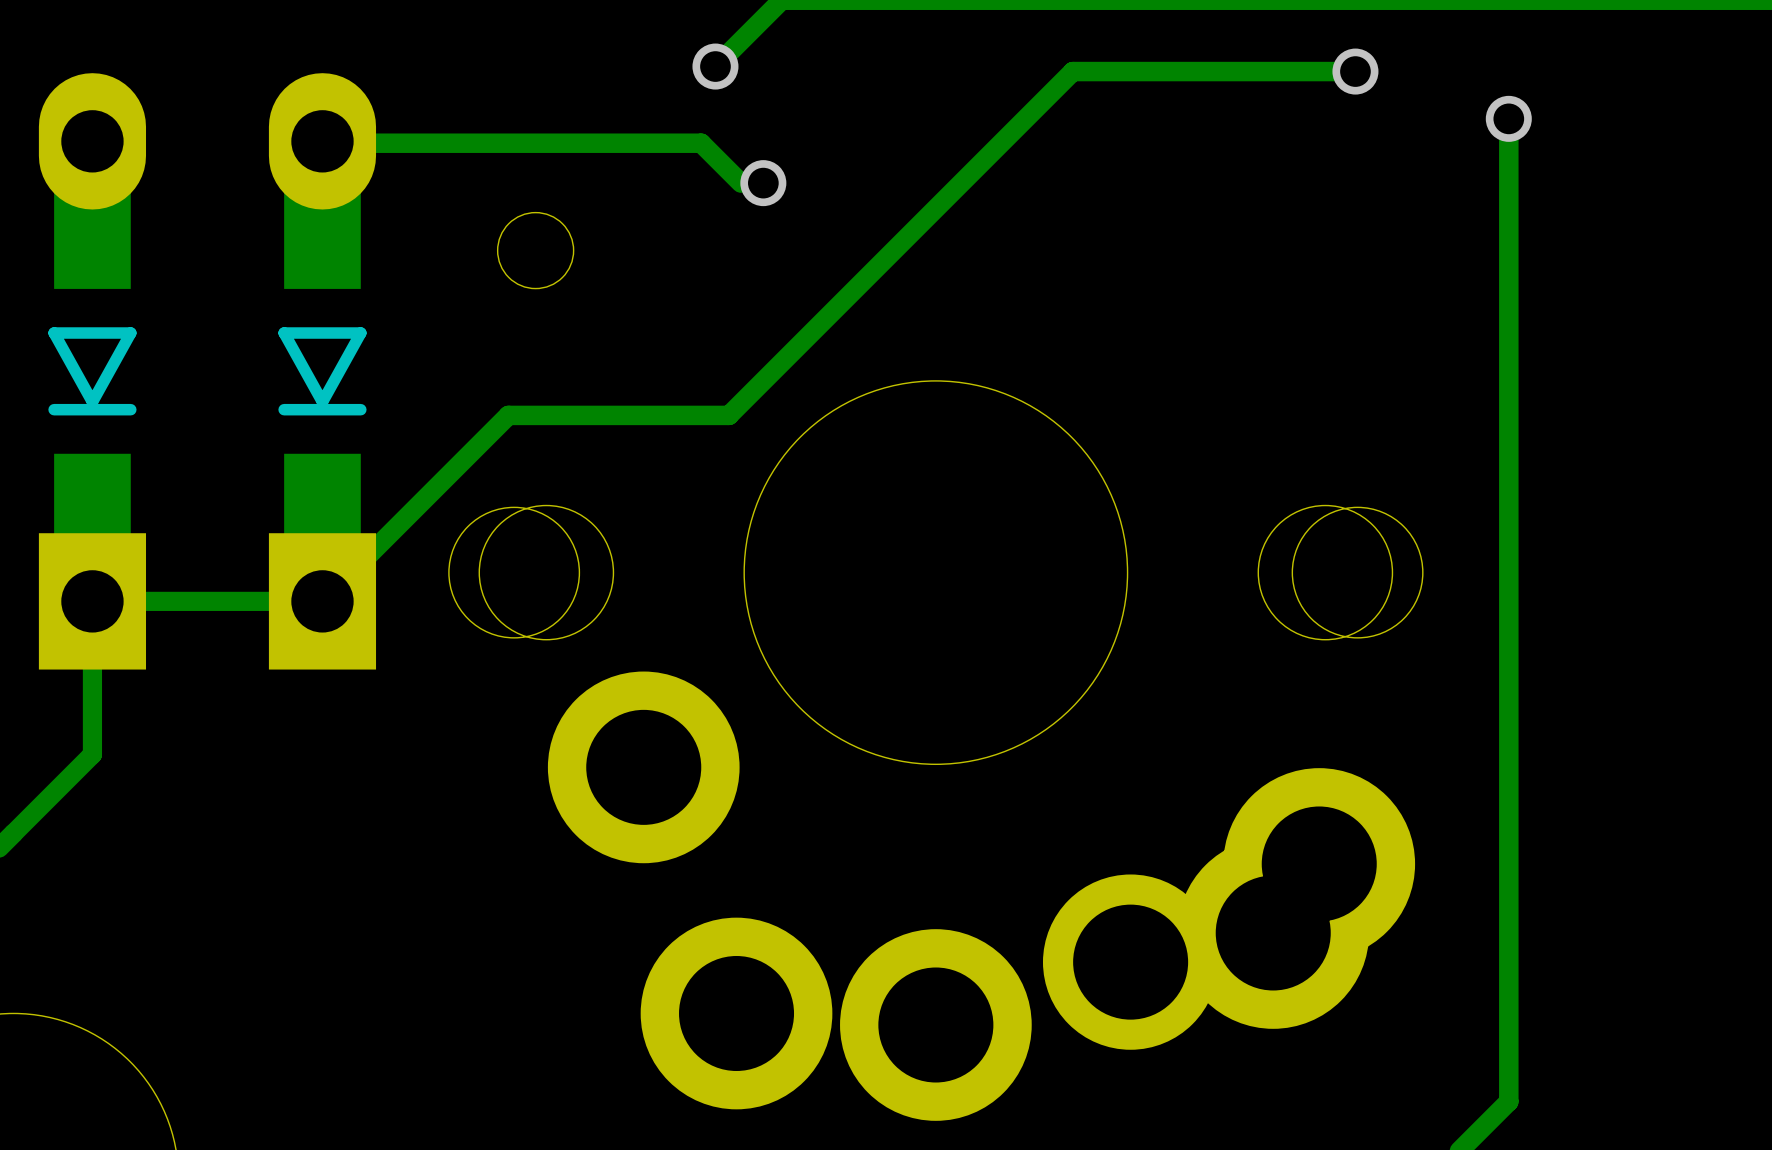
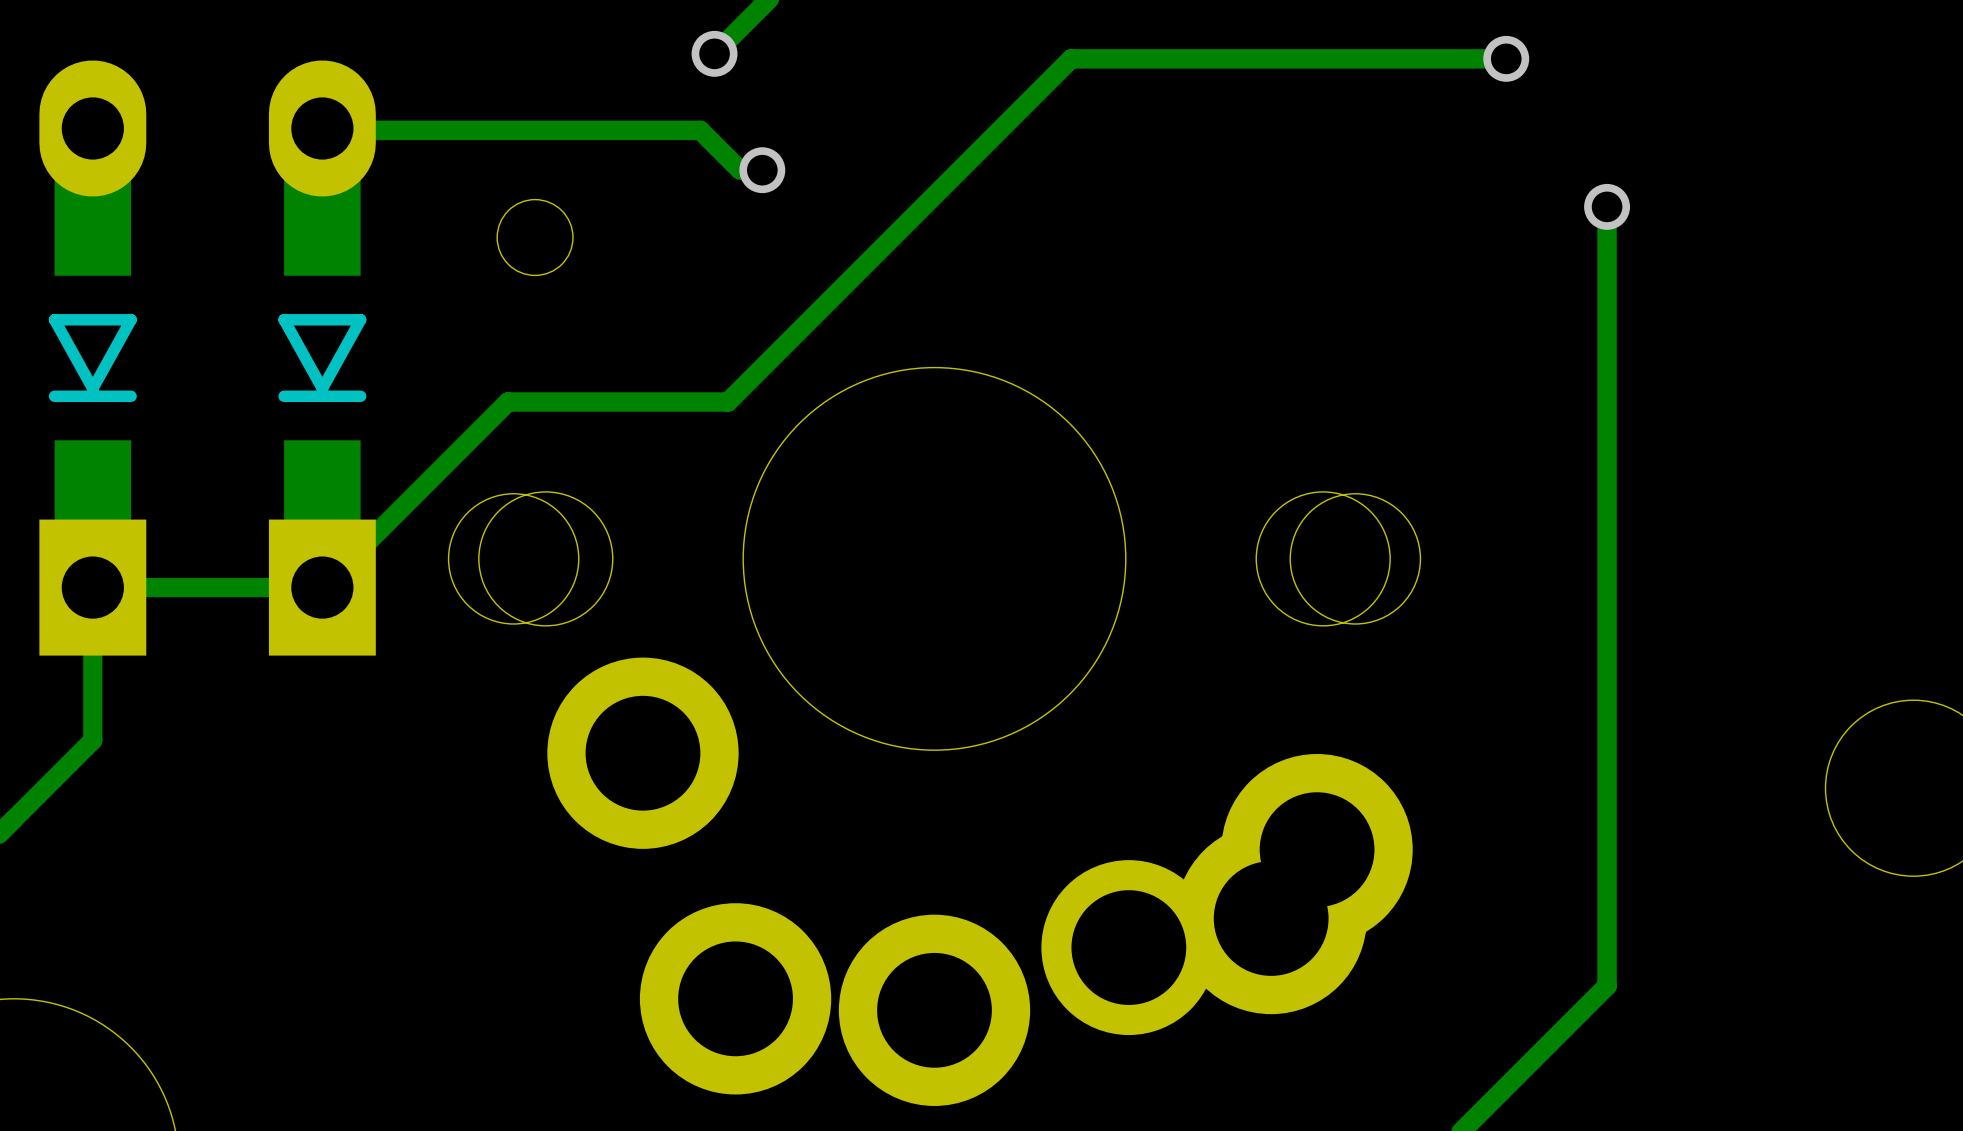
via: (1355, 71) -> none
track: none -> (1506, 58) (1353, 58)
track: (1508, 118) (1508, 1101) -> (1607, 206) (1607, 985) (1506, 1086)
via position: (1508, 118) -> (1506, 58)
via: none -> (1607, 206)

